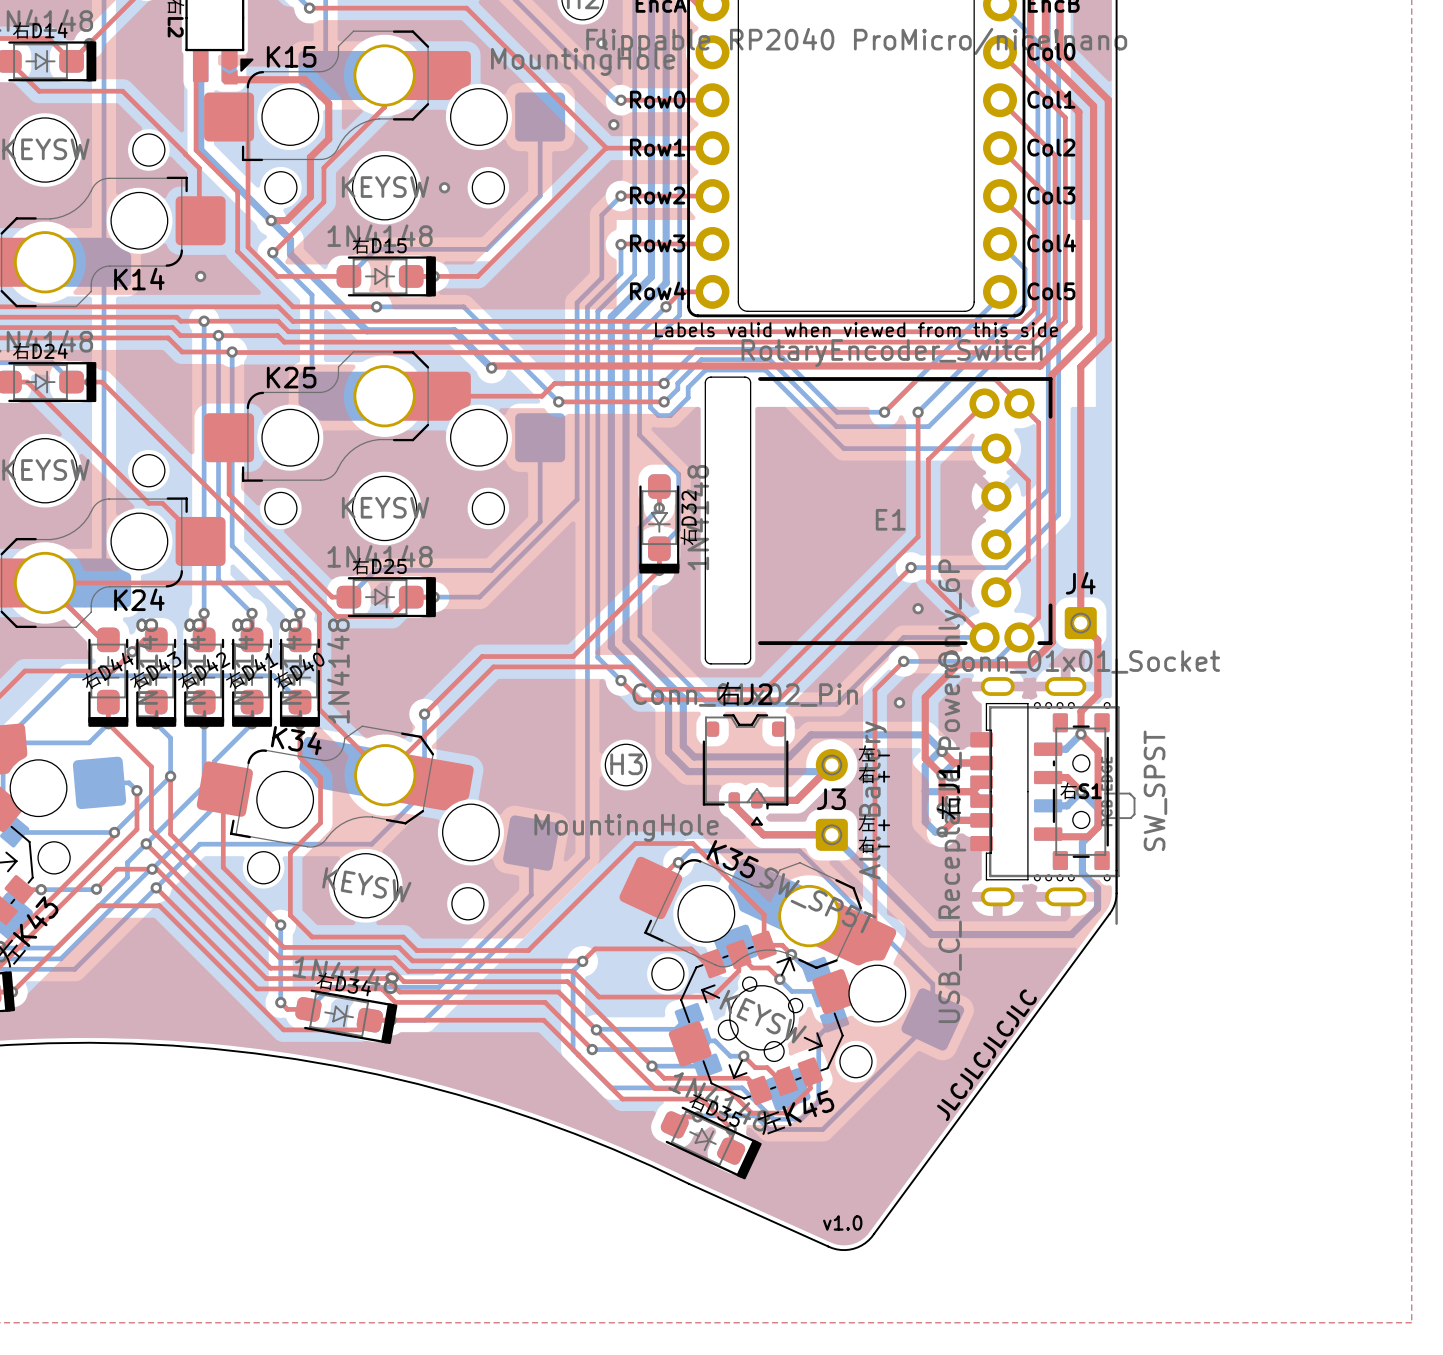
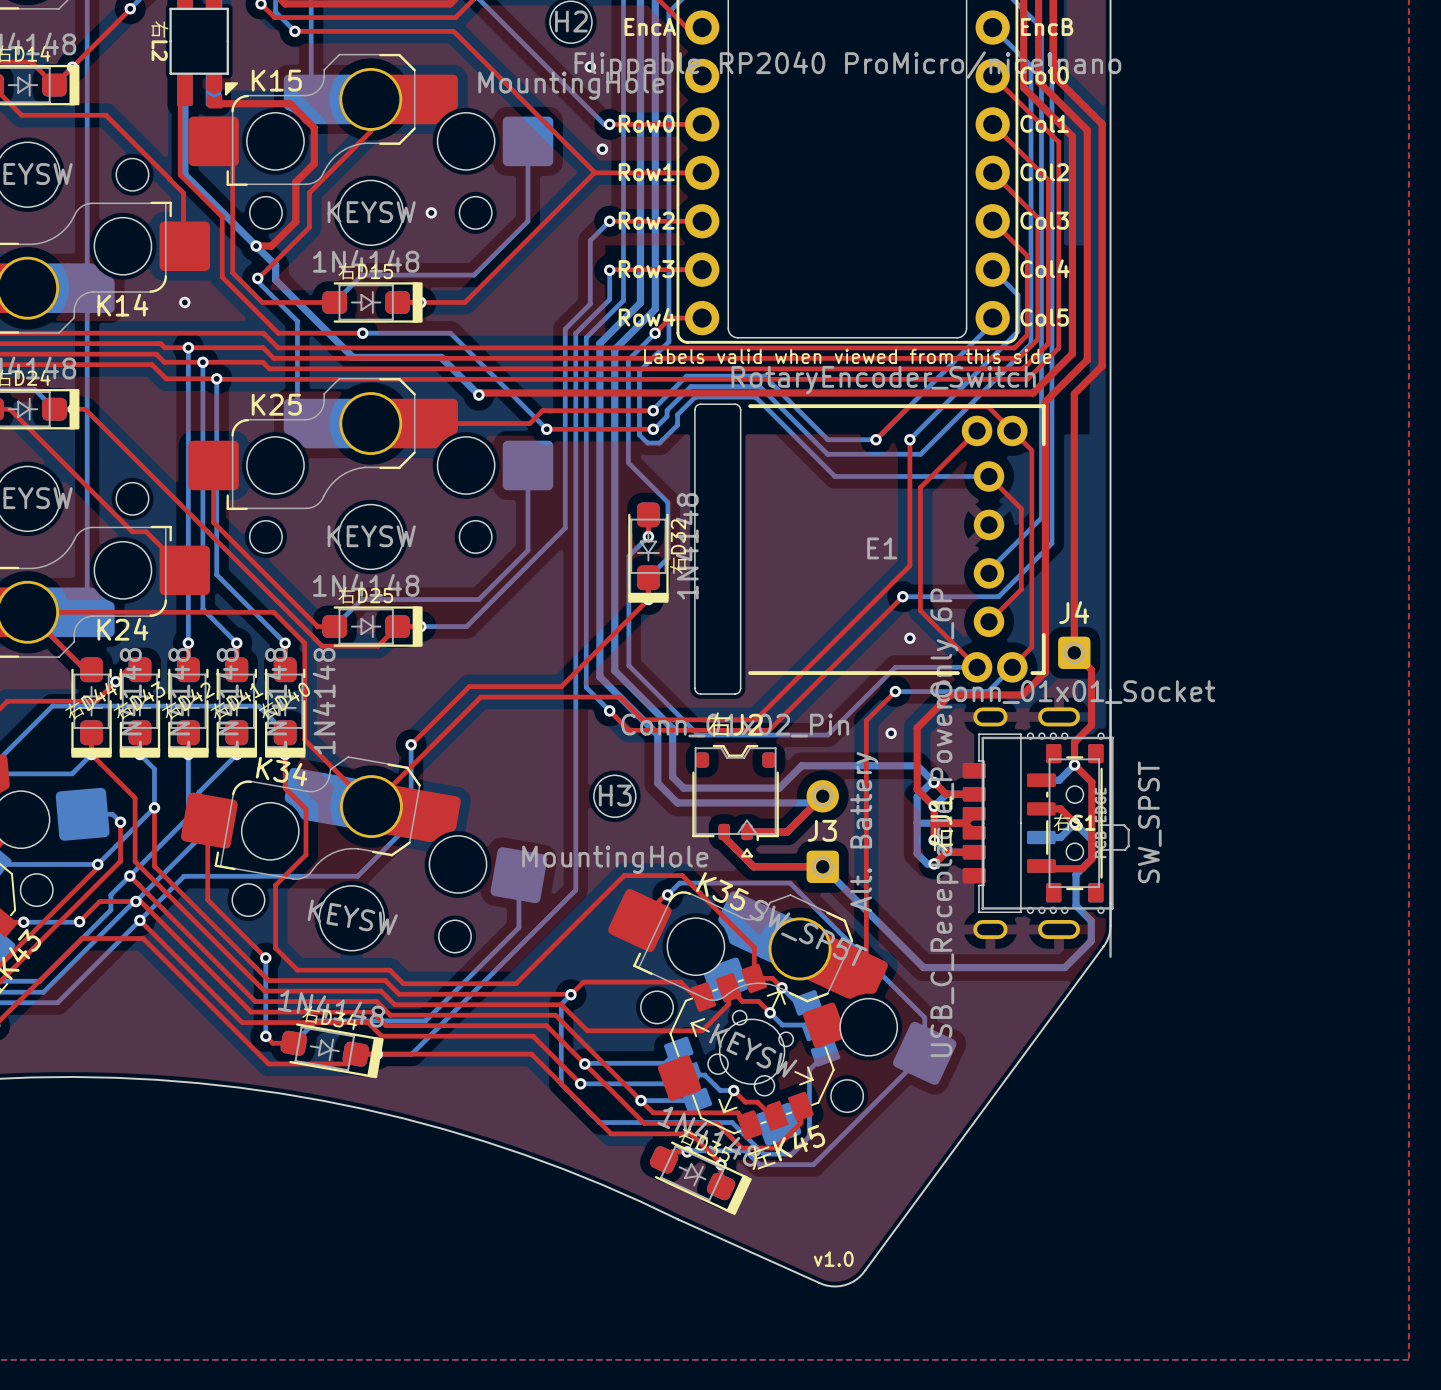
text: 左- (873, 753) -> none
text: 右+ (873, 774) -> none
text: 左+ (873, 823) -> none
text: 右- (873, 844) -> none
text: JLCJLCJLCJLC (986, 1055) -> none

